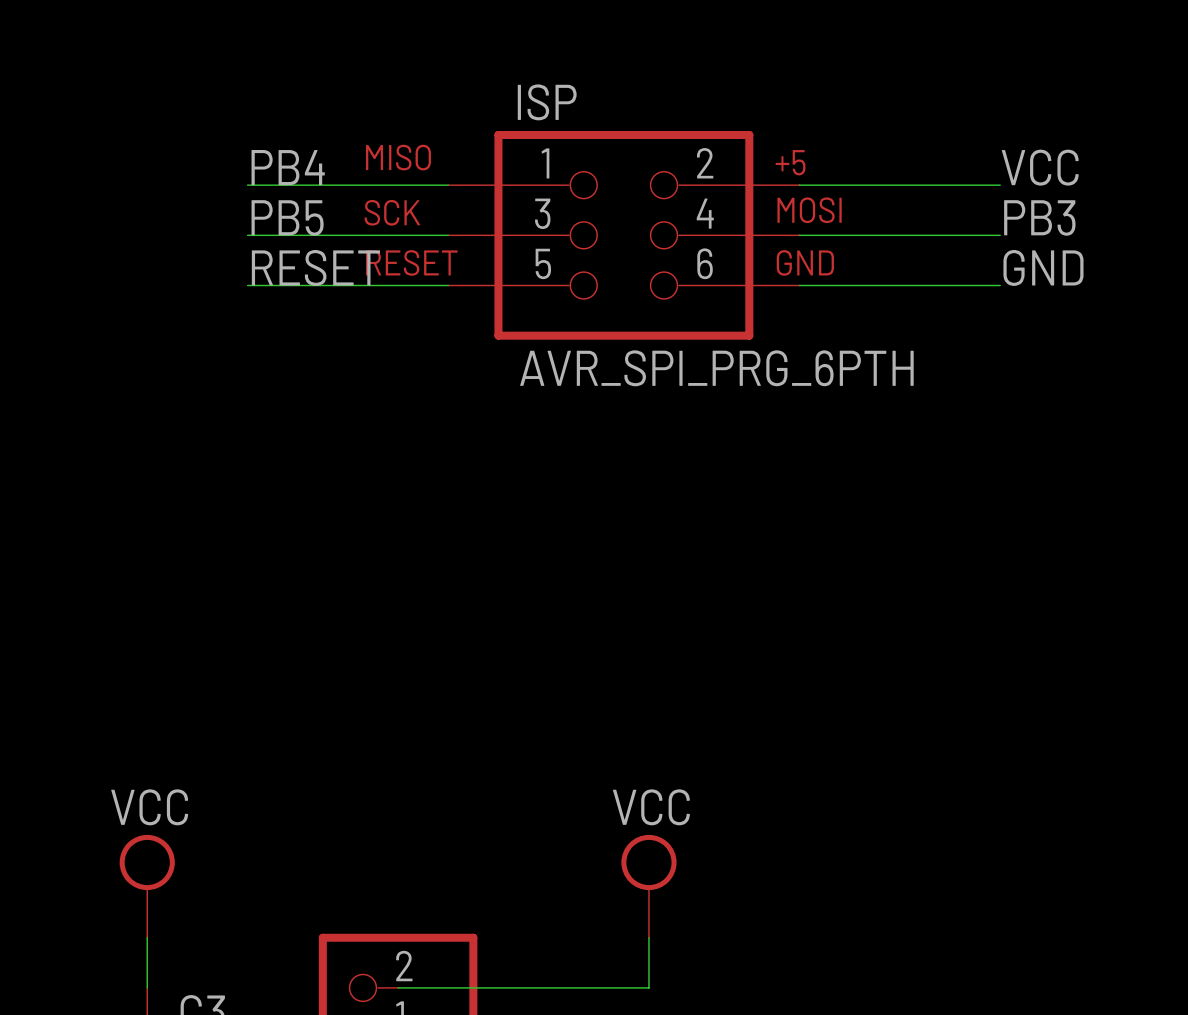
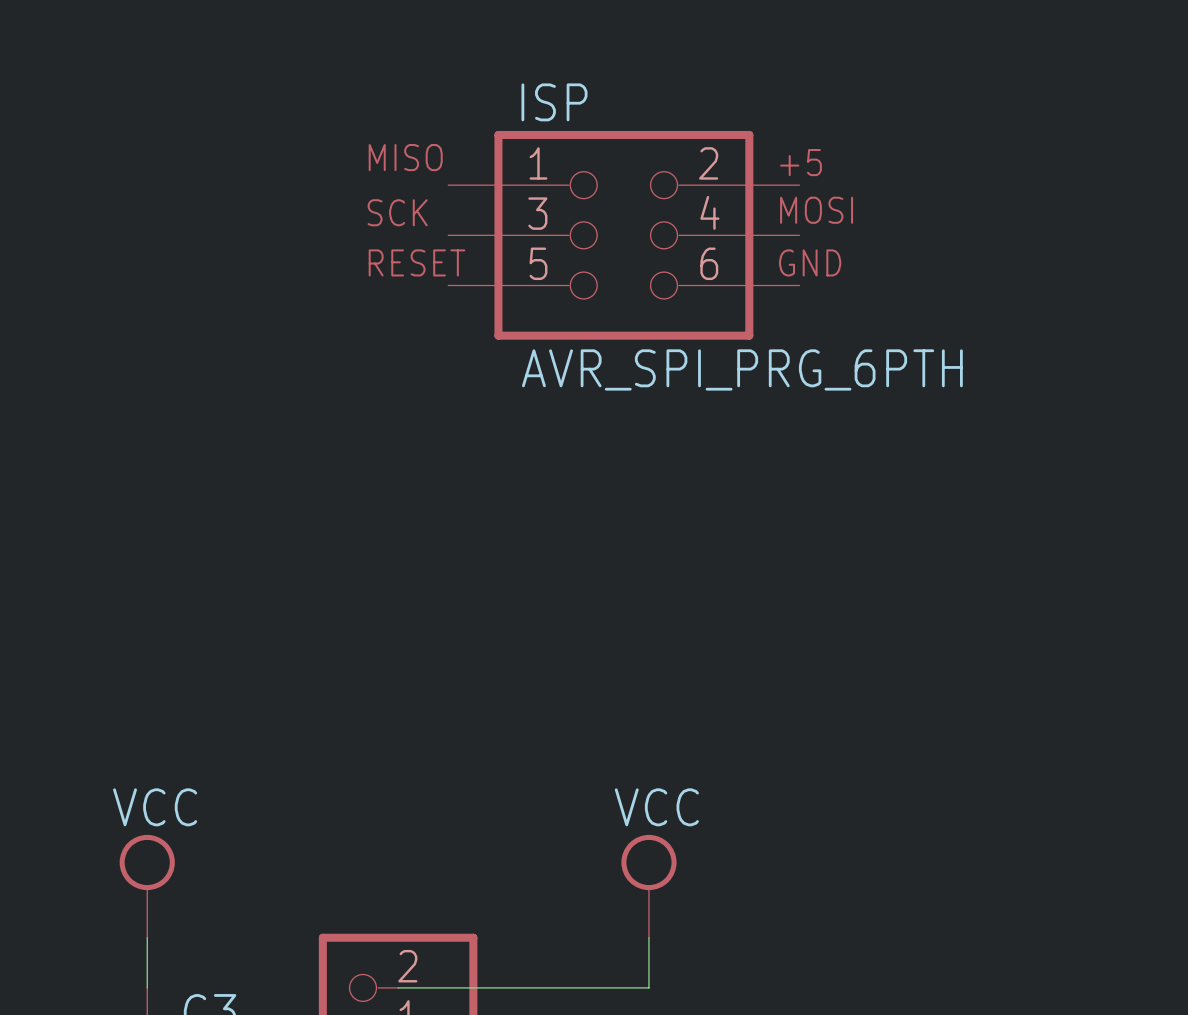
label: PB4 (288, 167) -> none
label: VCC (1040, 167) -> none
wire: (247, 185) (448, 185) -> none
wire: (799, 185) (1000, 185) -> none
label: PB5 (287, 217) -> none
label: PB3 (1039, 217) -> none
wire: (247, 235) (448, 235) -> none
wire: (799, 235) (1000, 235) -> none
label: RESET (315, 267) -> none
label: GND (1043, 267) -> none
wire: (247, 285) (448, 285) -> none
wire: (799, 285) (1000, 285) -> none

